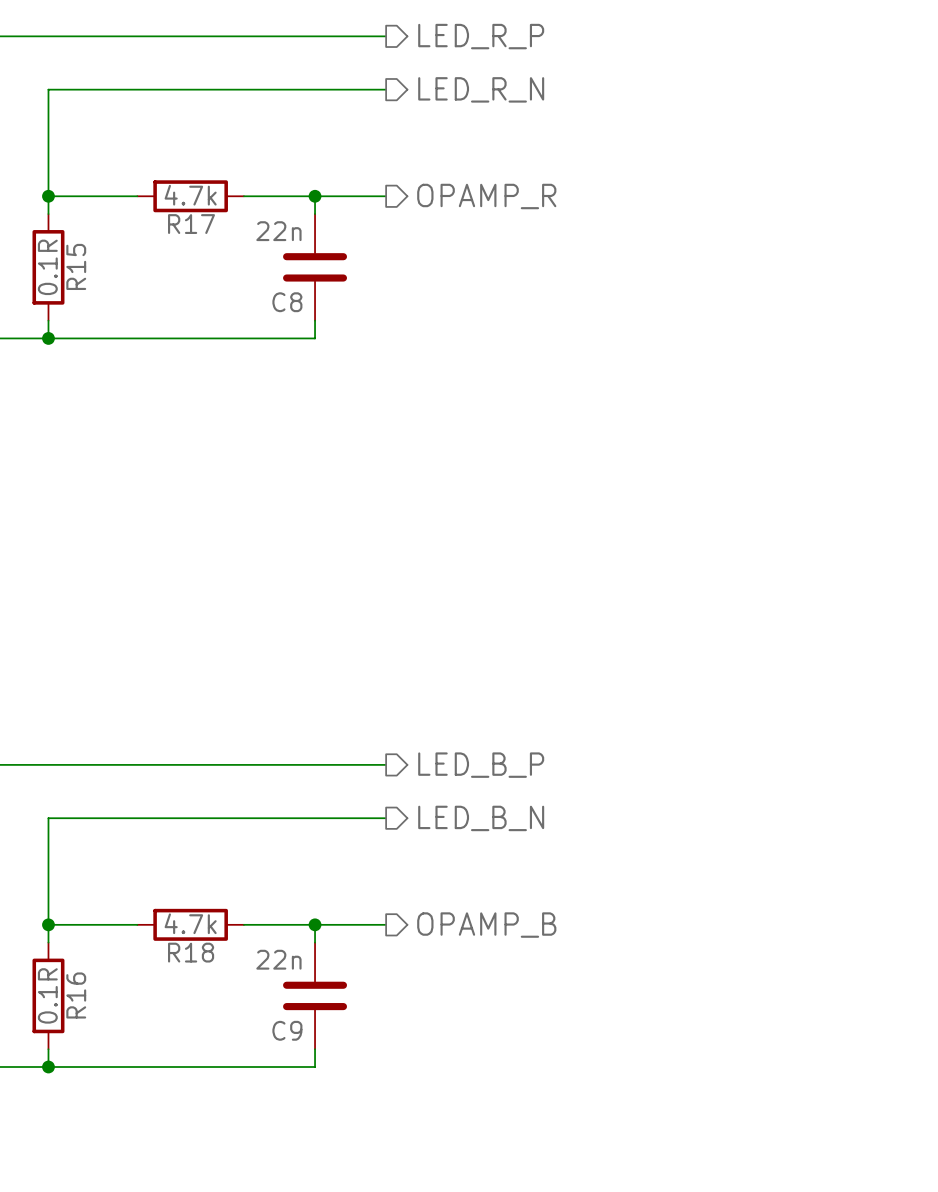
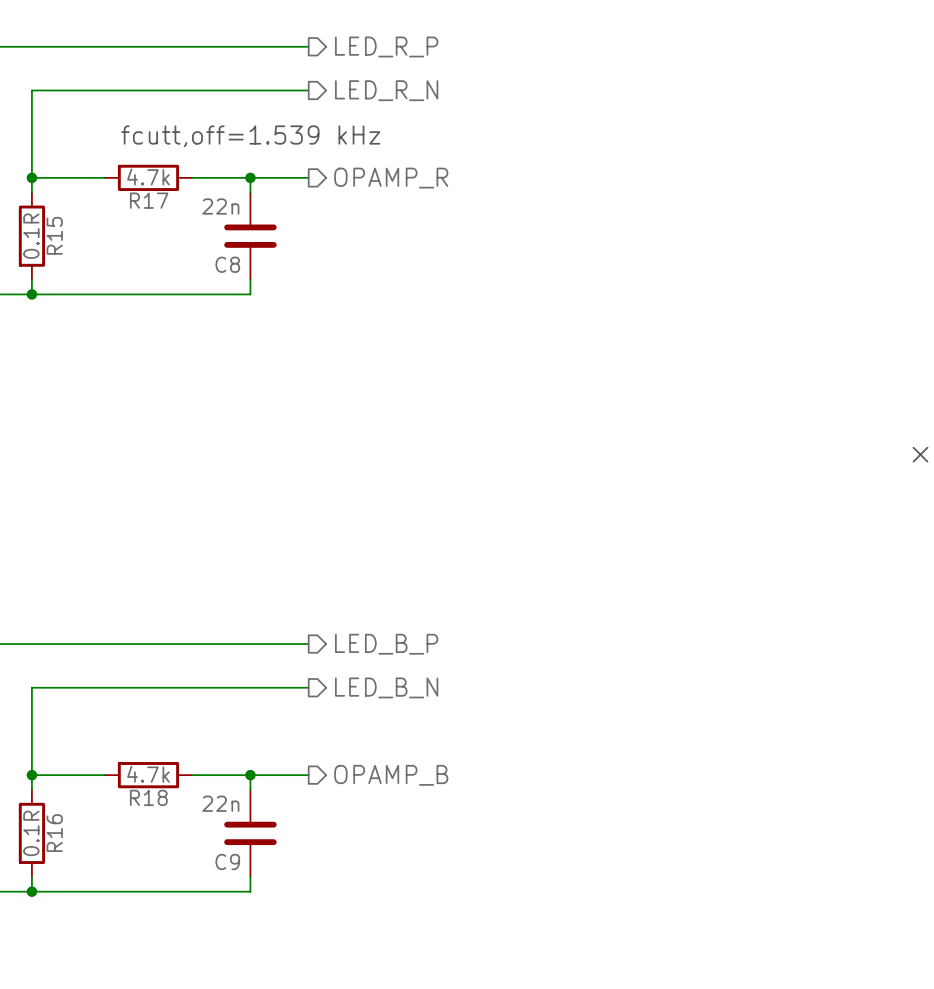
text: none -> fcutt,off=1.539 kHz (250, 136)

